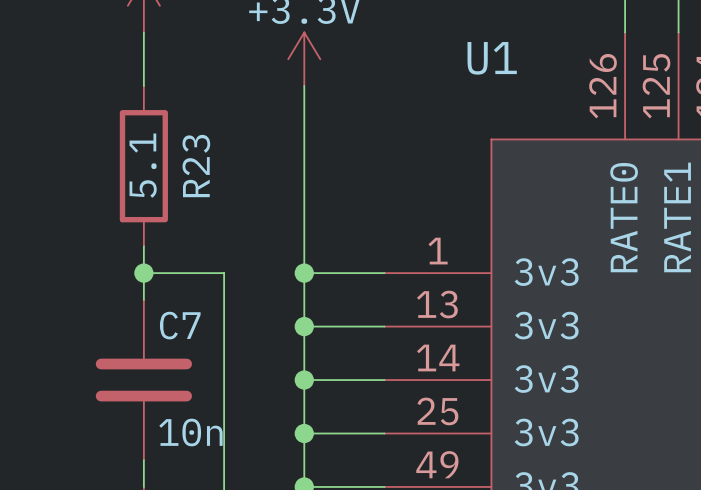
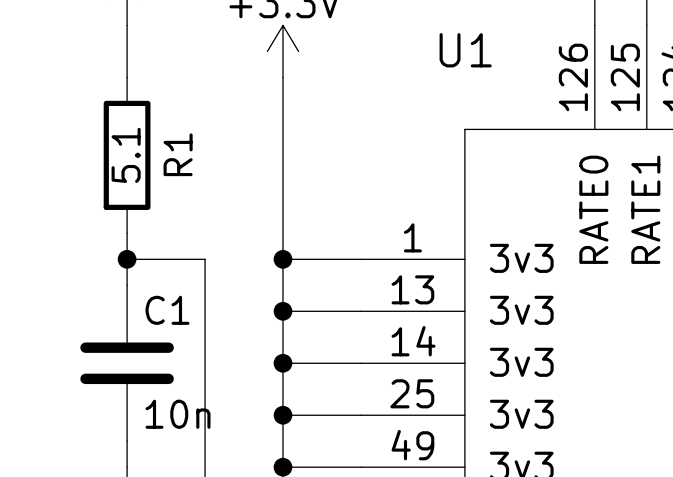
R23 name: R23 (196, 166) -> R1 (178, 154)
C7 name: C7 (180, 325) -> C1 (167, 310)

